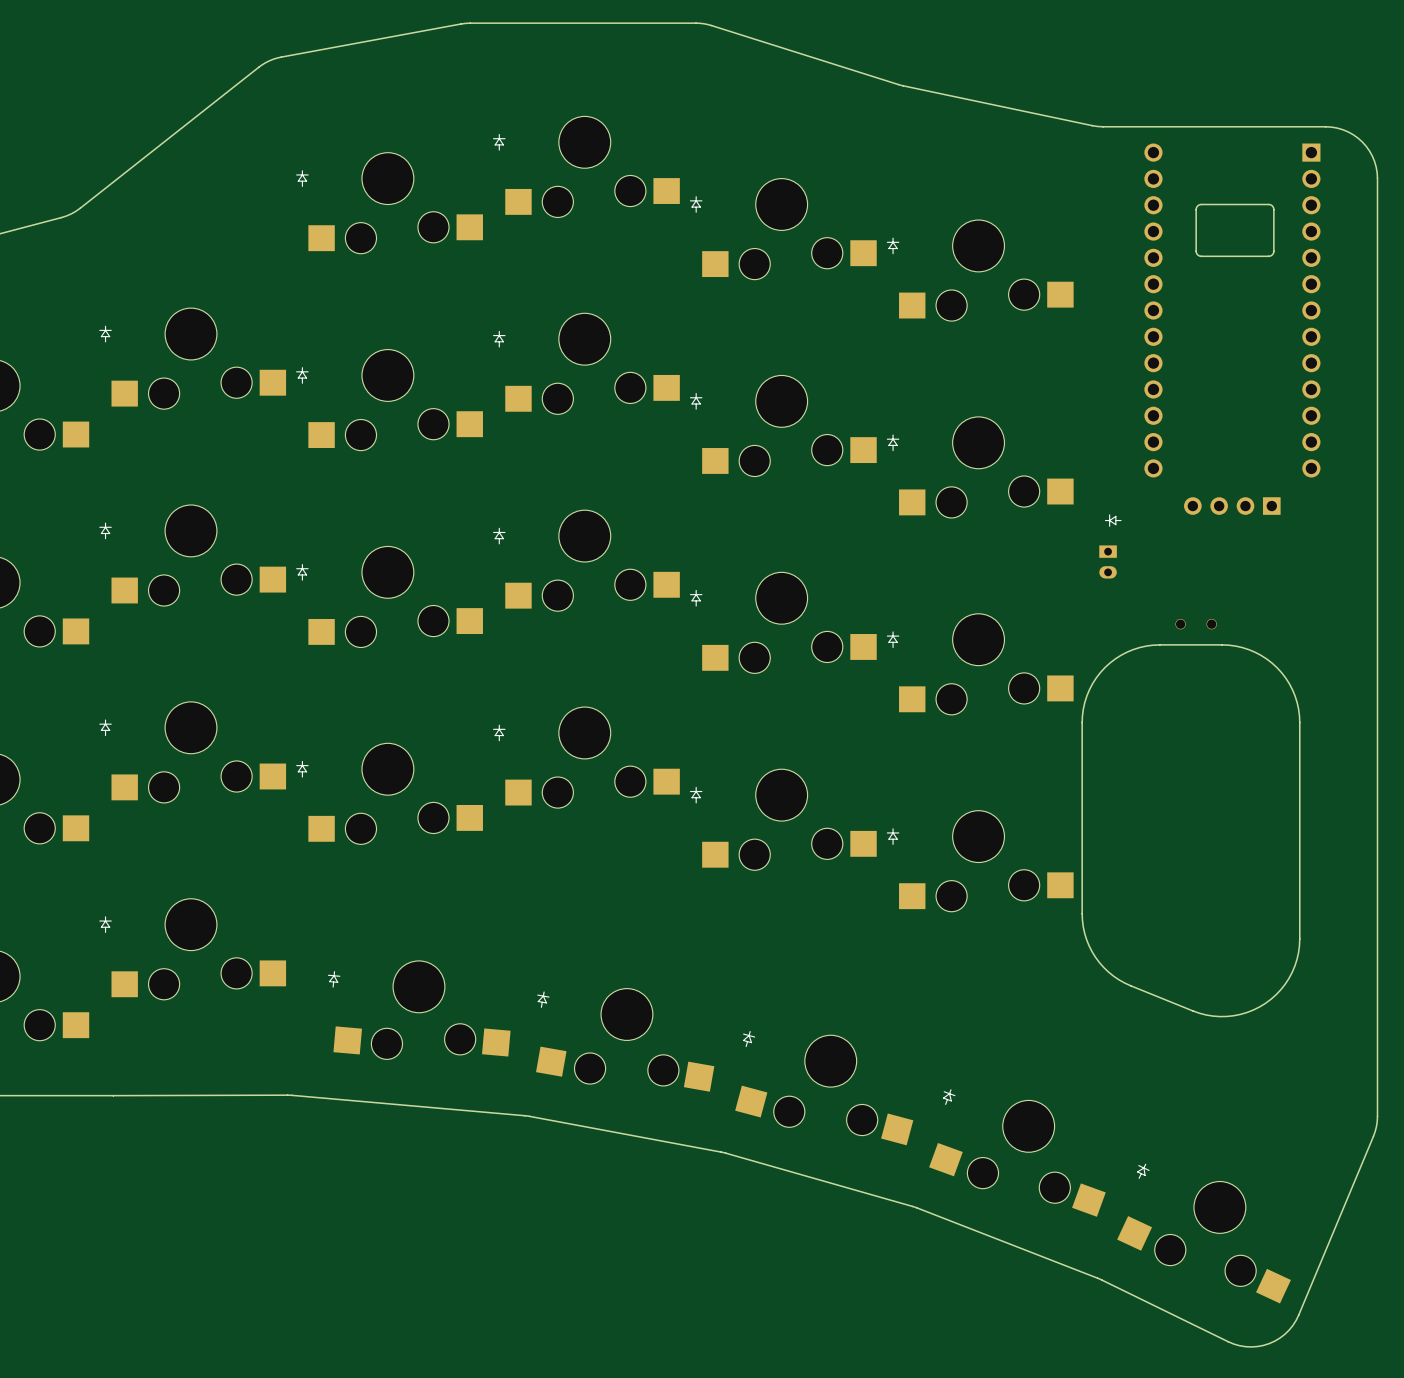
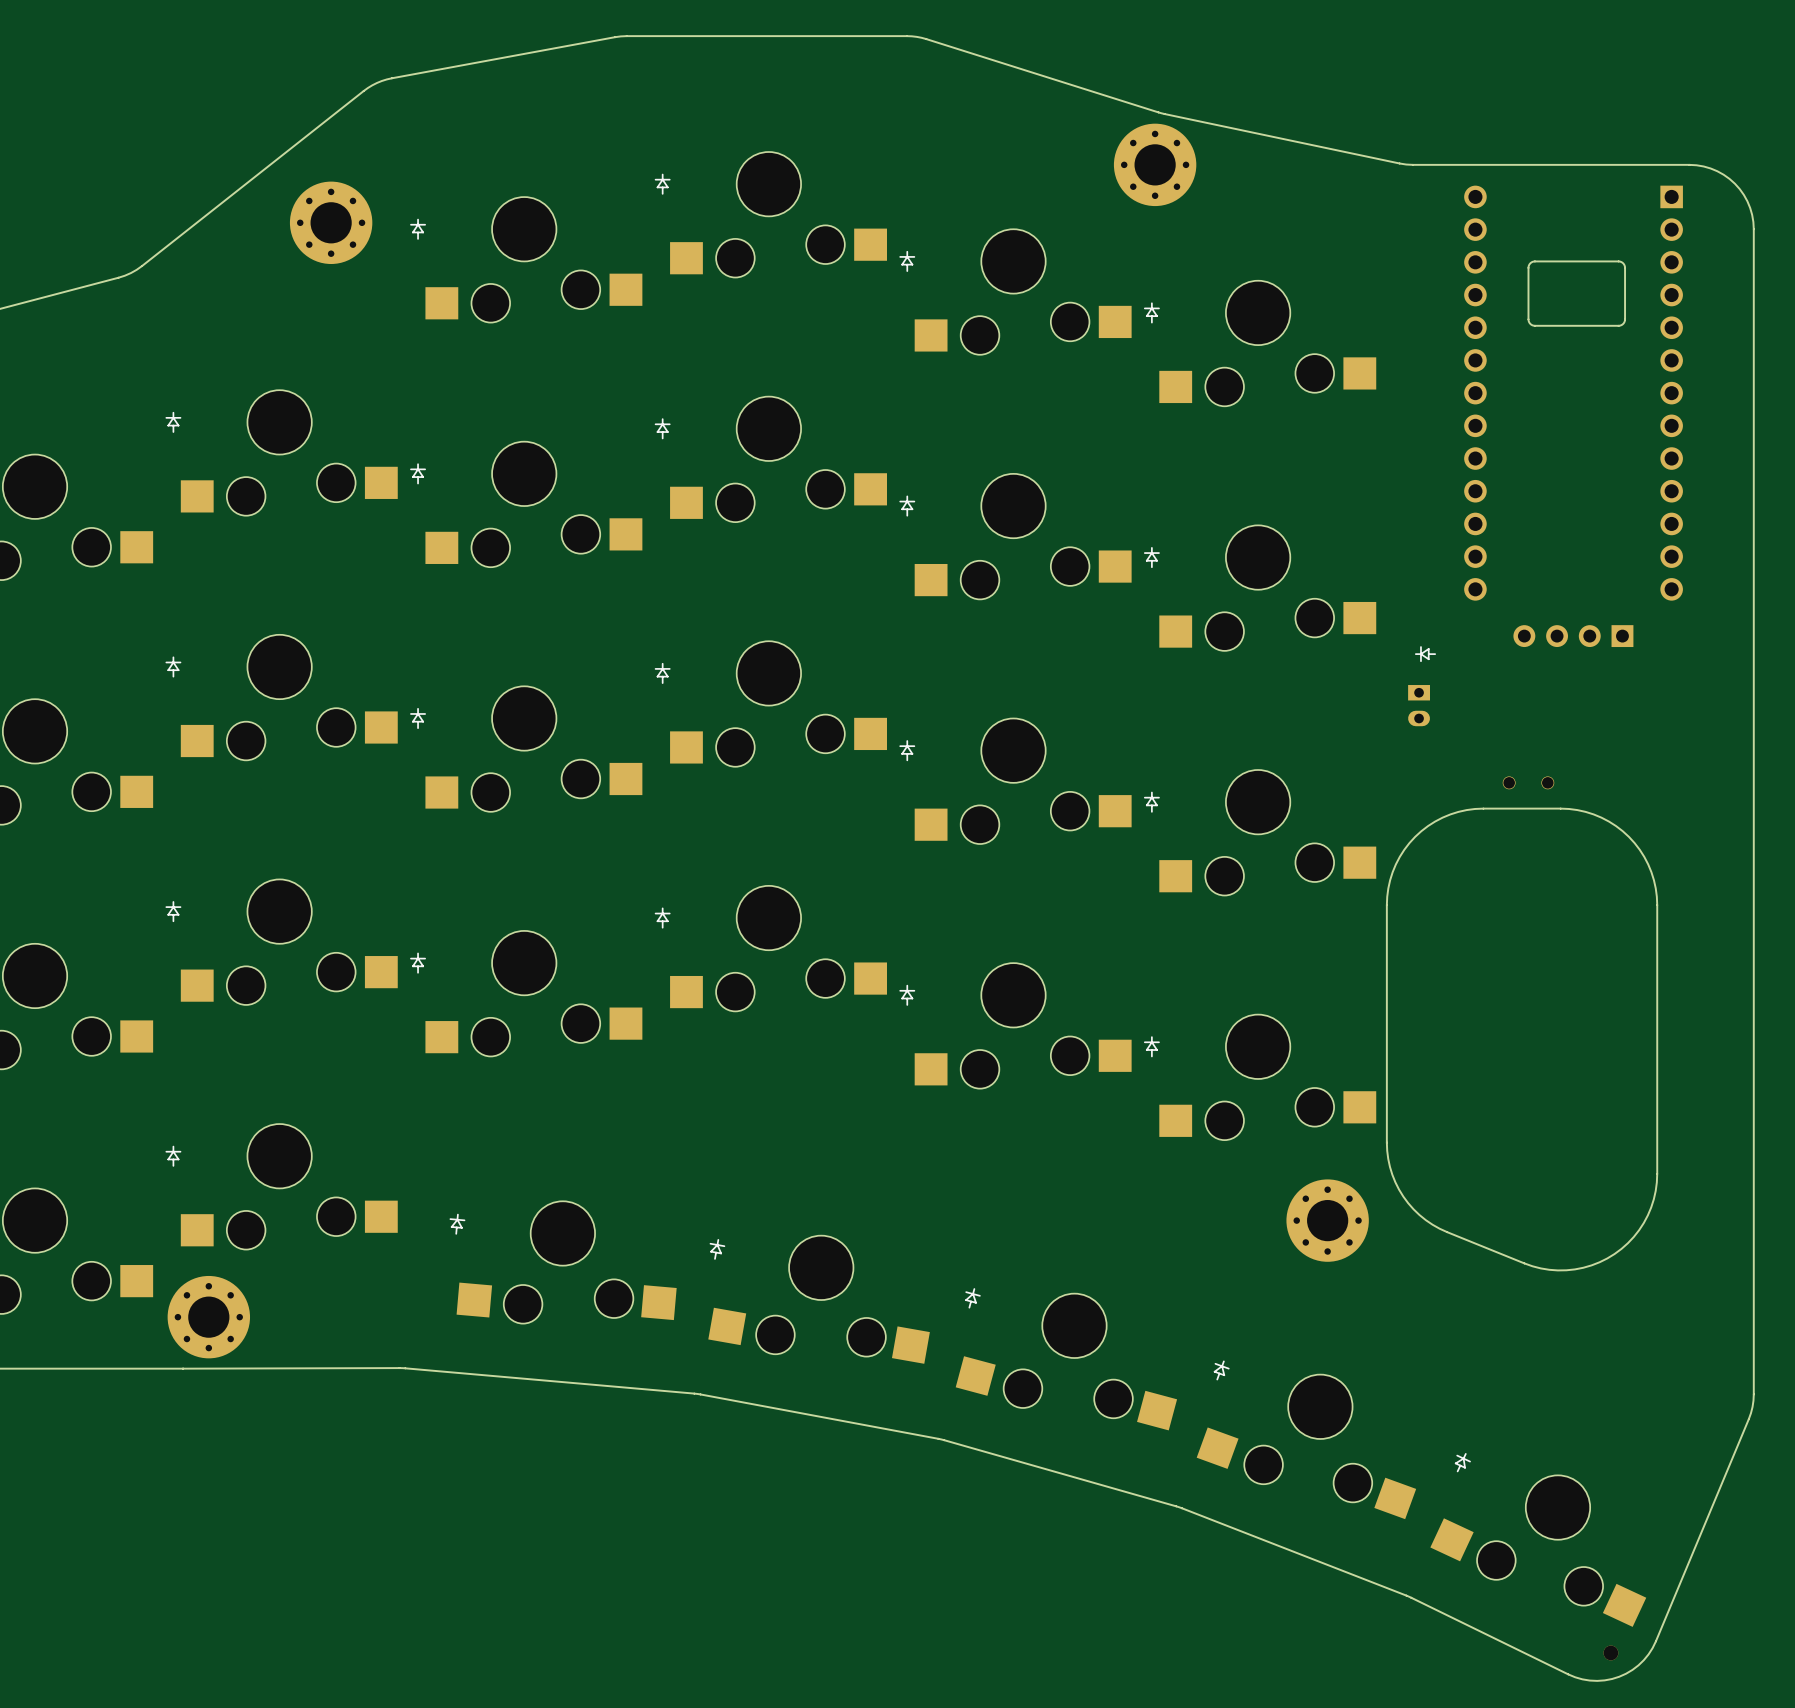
part: none -> (1155, 164)
part: none -> (331, 222)
part: none -> (1327, 1220)
part: none -> (208, 1317)
part: none -> (1610, 1652)

